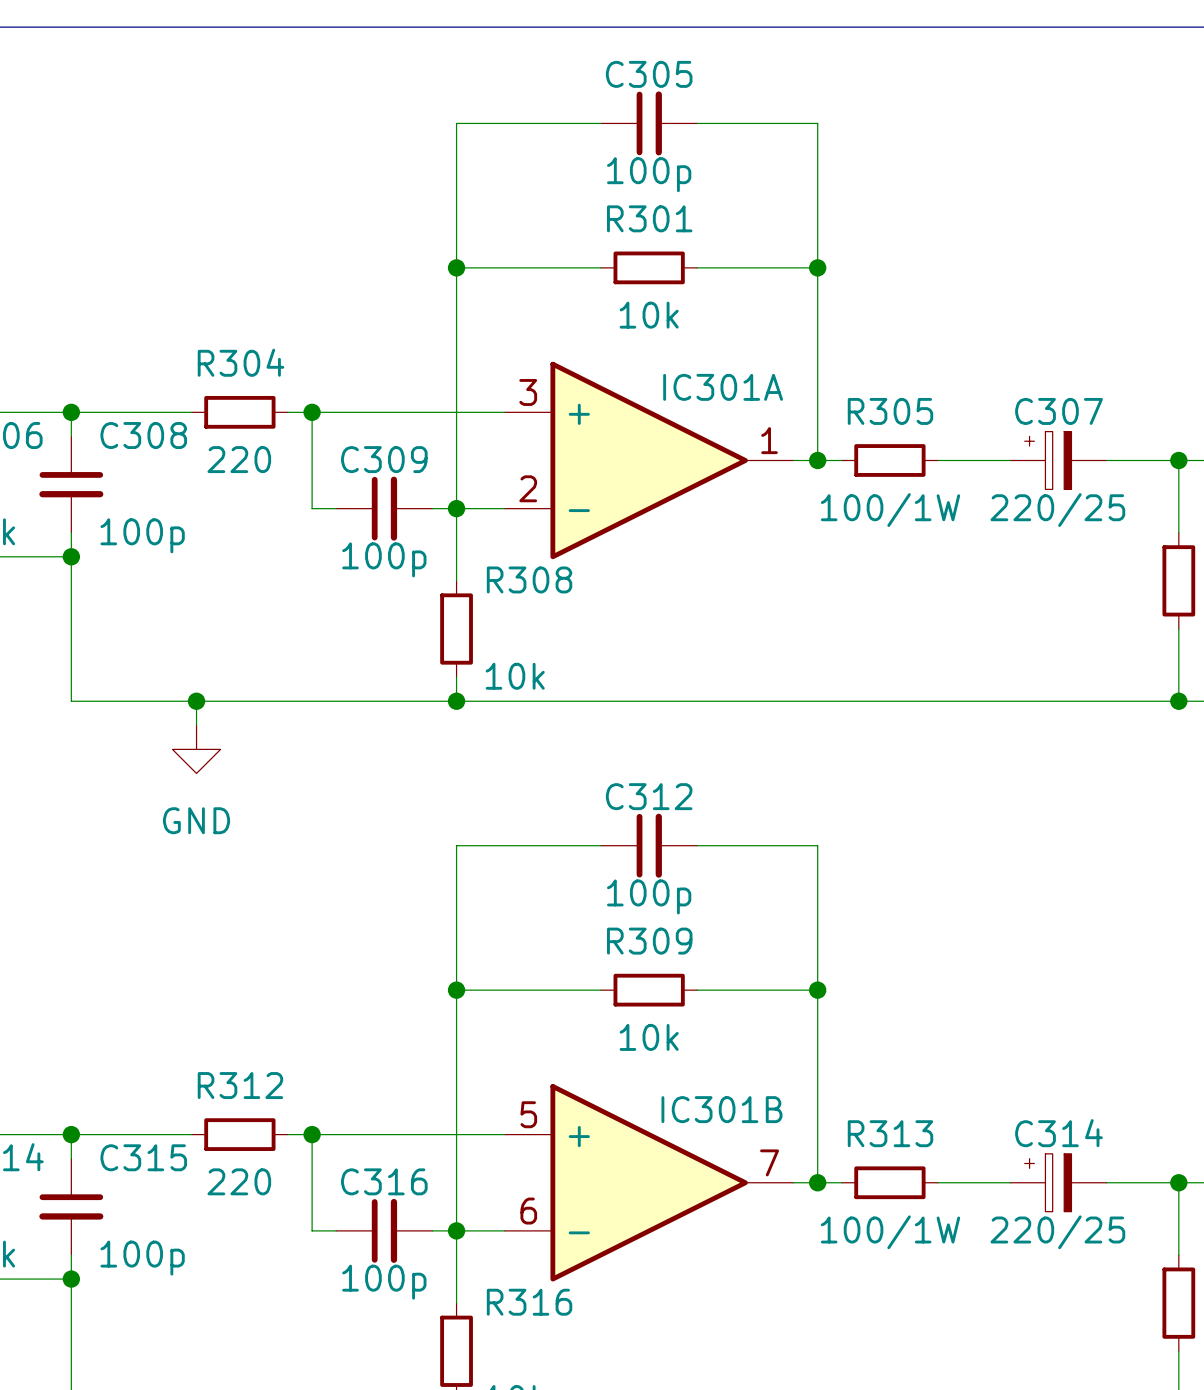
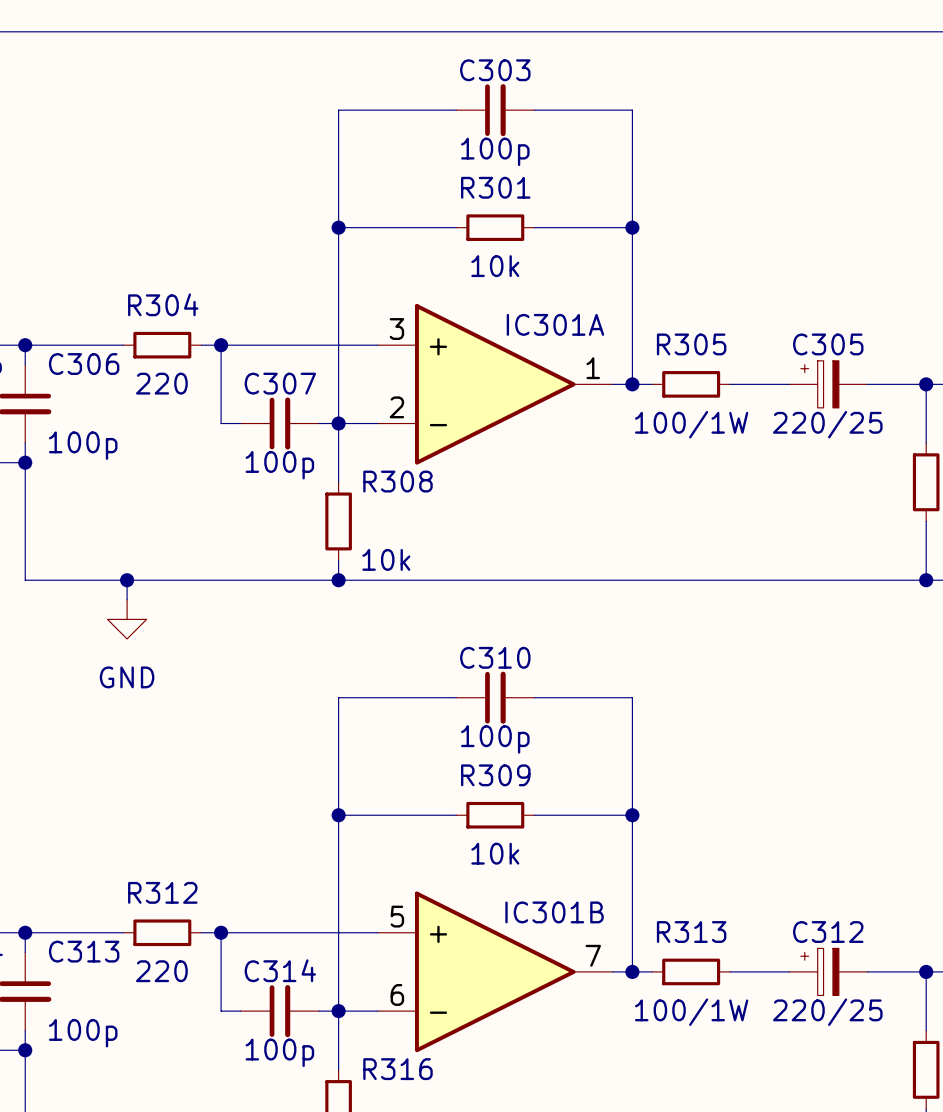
C305 name: C305 (649, 74) -> C303 (495, 70)
C307 name: C307 (1059, 411) -> C305 (828, 344)
C308 name: C308 (143, 435) -> C306 (84, 364)
C309 name: C309 (384, 459) -> C307 (280, 383)
C312 name: C312 (649, 796) -> C310 (495, 657)
C314 name: C314 (1059, 1133) -> C312 (828, 932)
C315 name: C315 (143, 1157) -> C313 (84, 951)
C316 name: C316 (384, 1181) -> C314 (280, 970)

